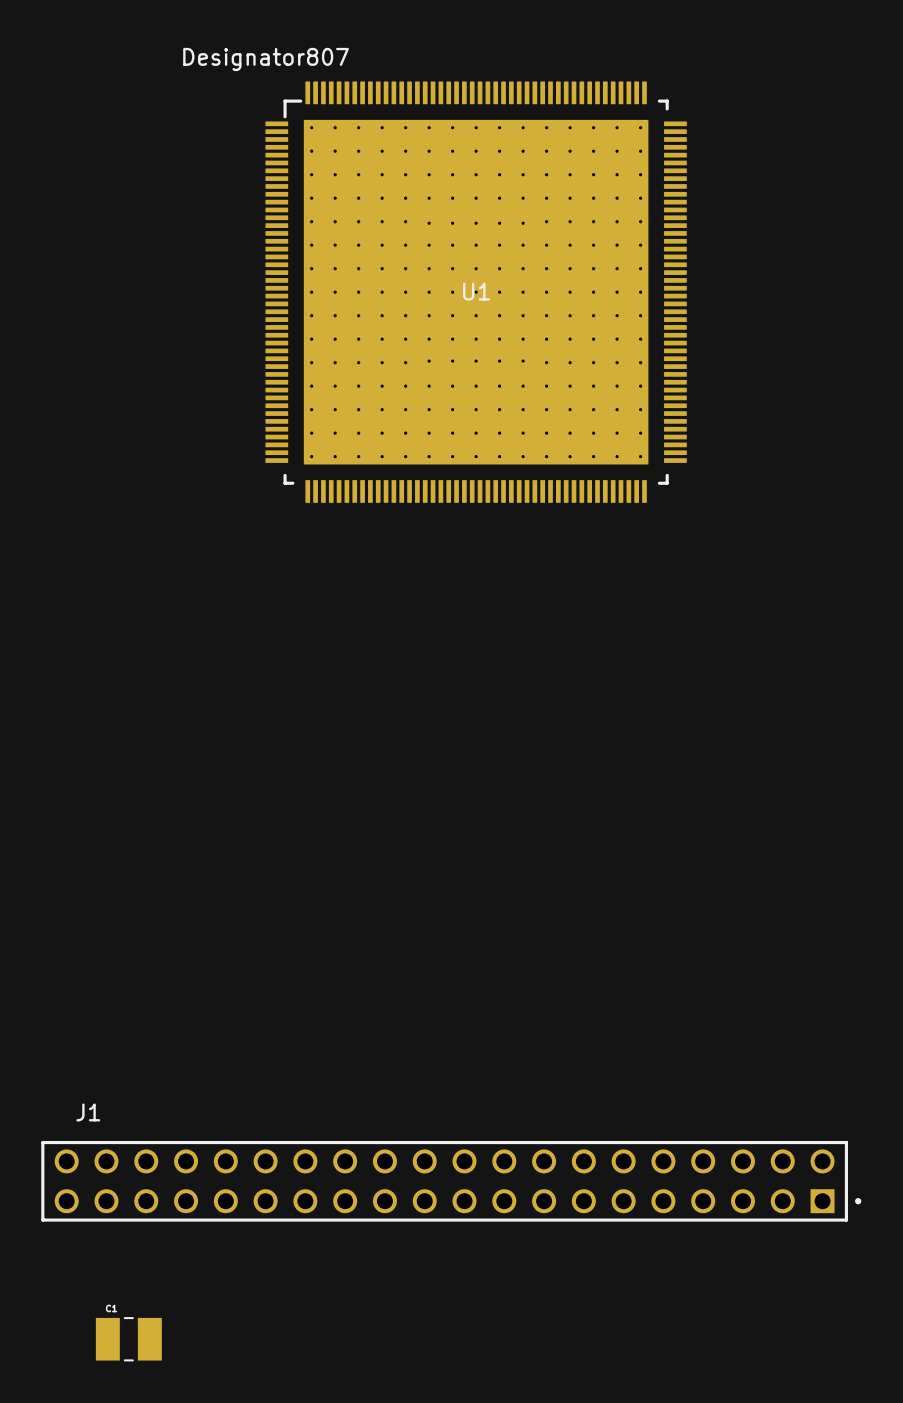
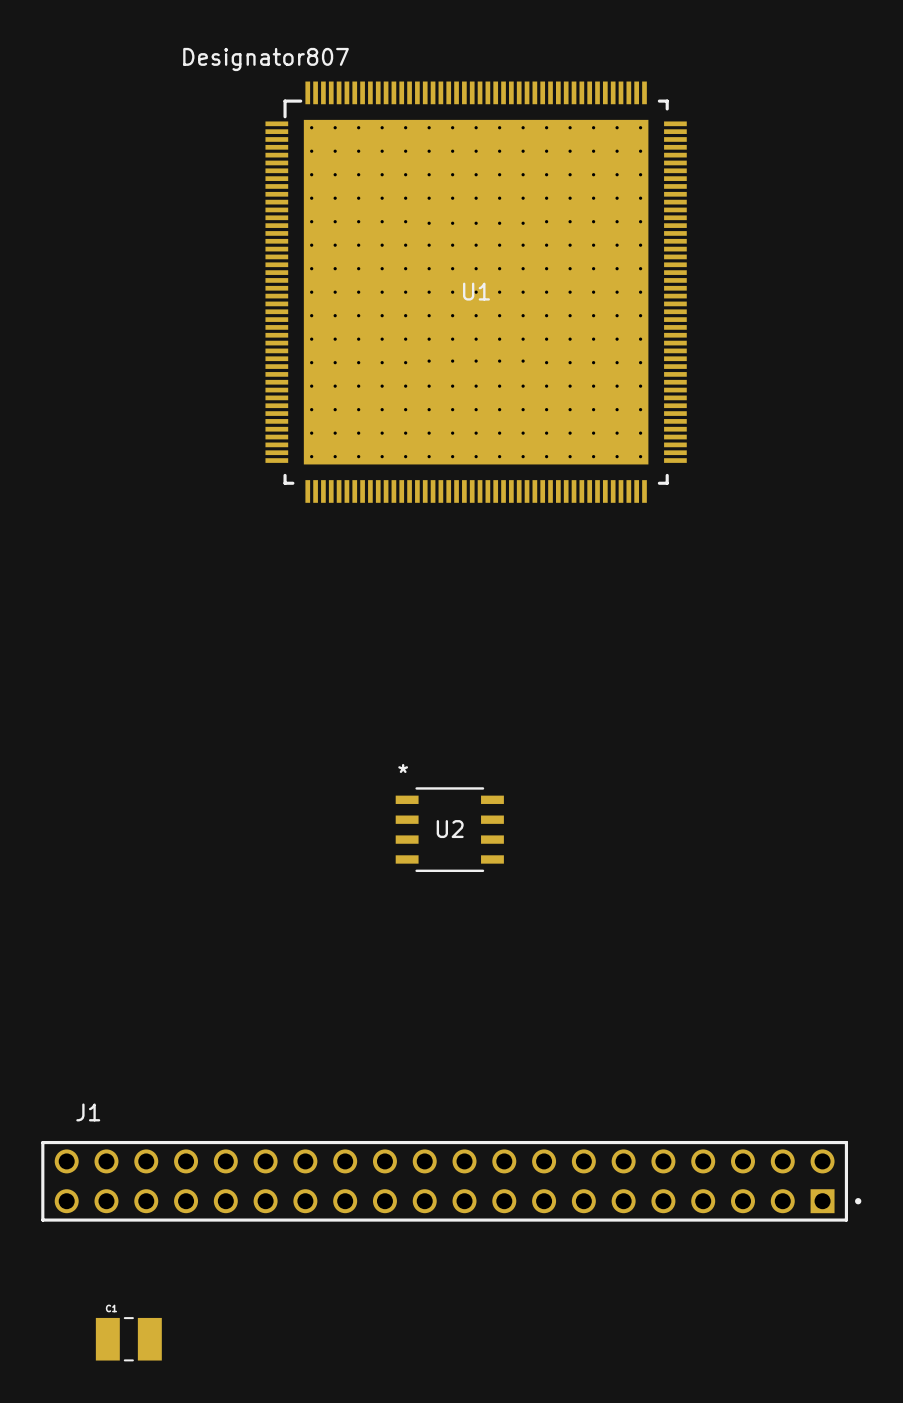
U2: none -> (449, 829)

